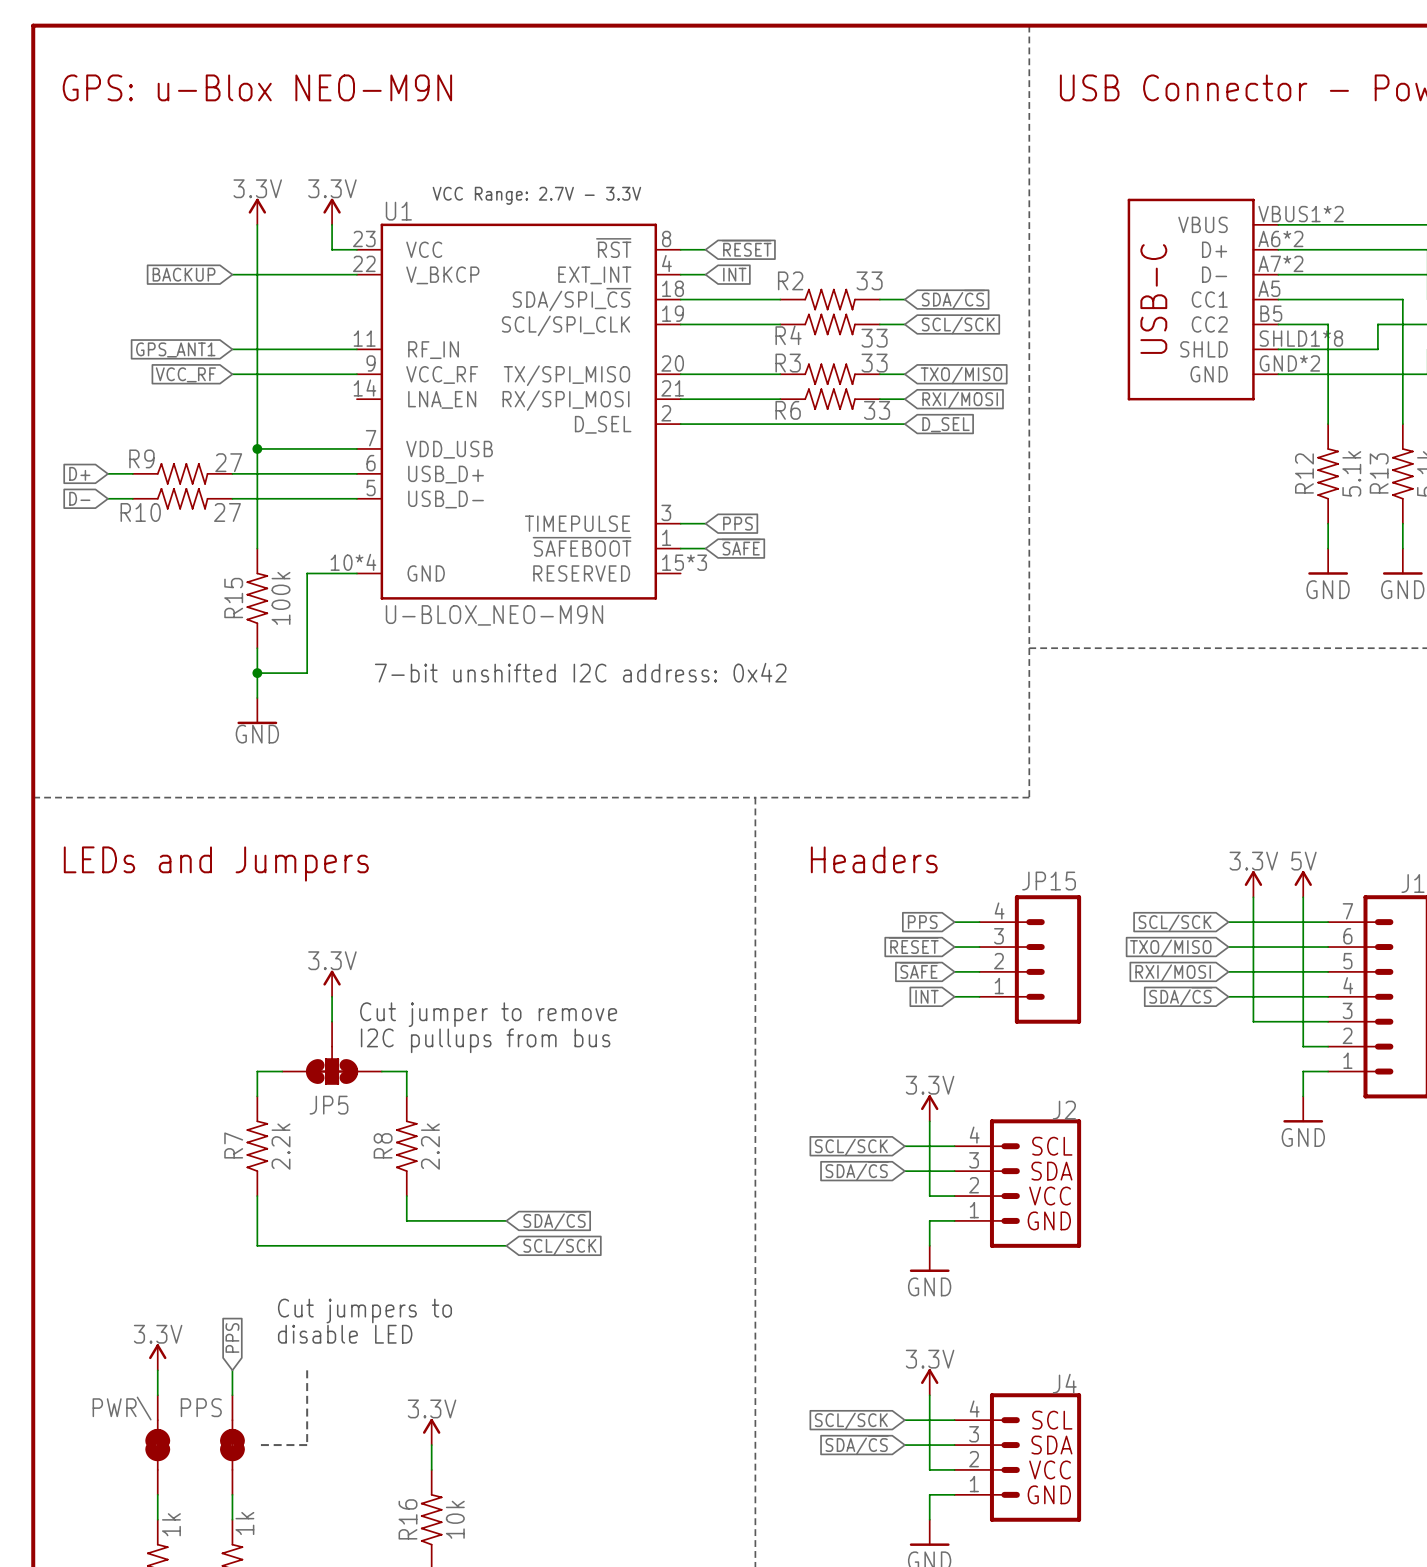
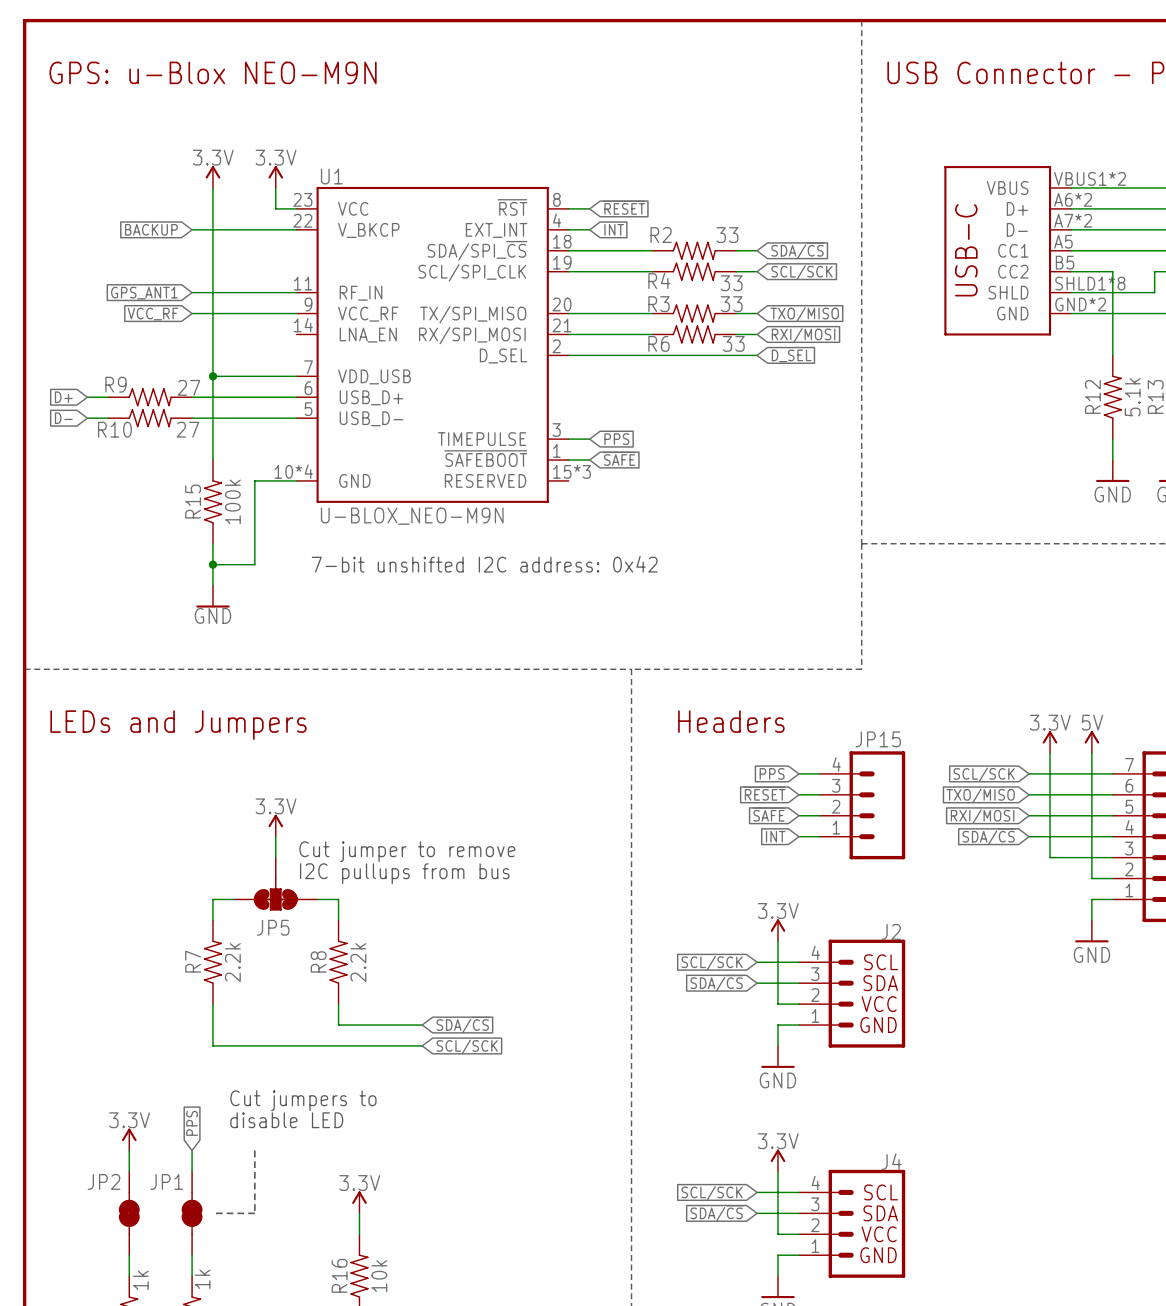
text: VCC Range: 2.7V - 3.3V (536, 195) -> none
PPS name: PPS (201, 1407) -> JP1 (166, 1181)
PWR\ name: PWR\ (122, 1408) -> JP2 (104, 1181)

